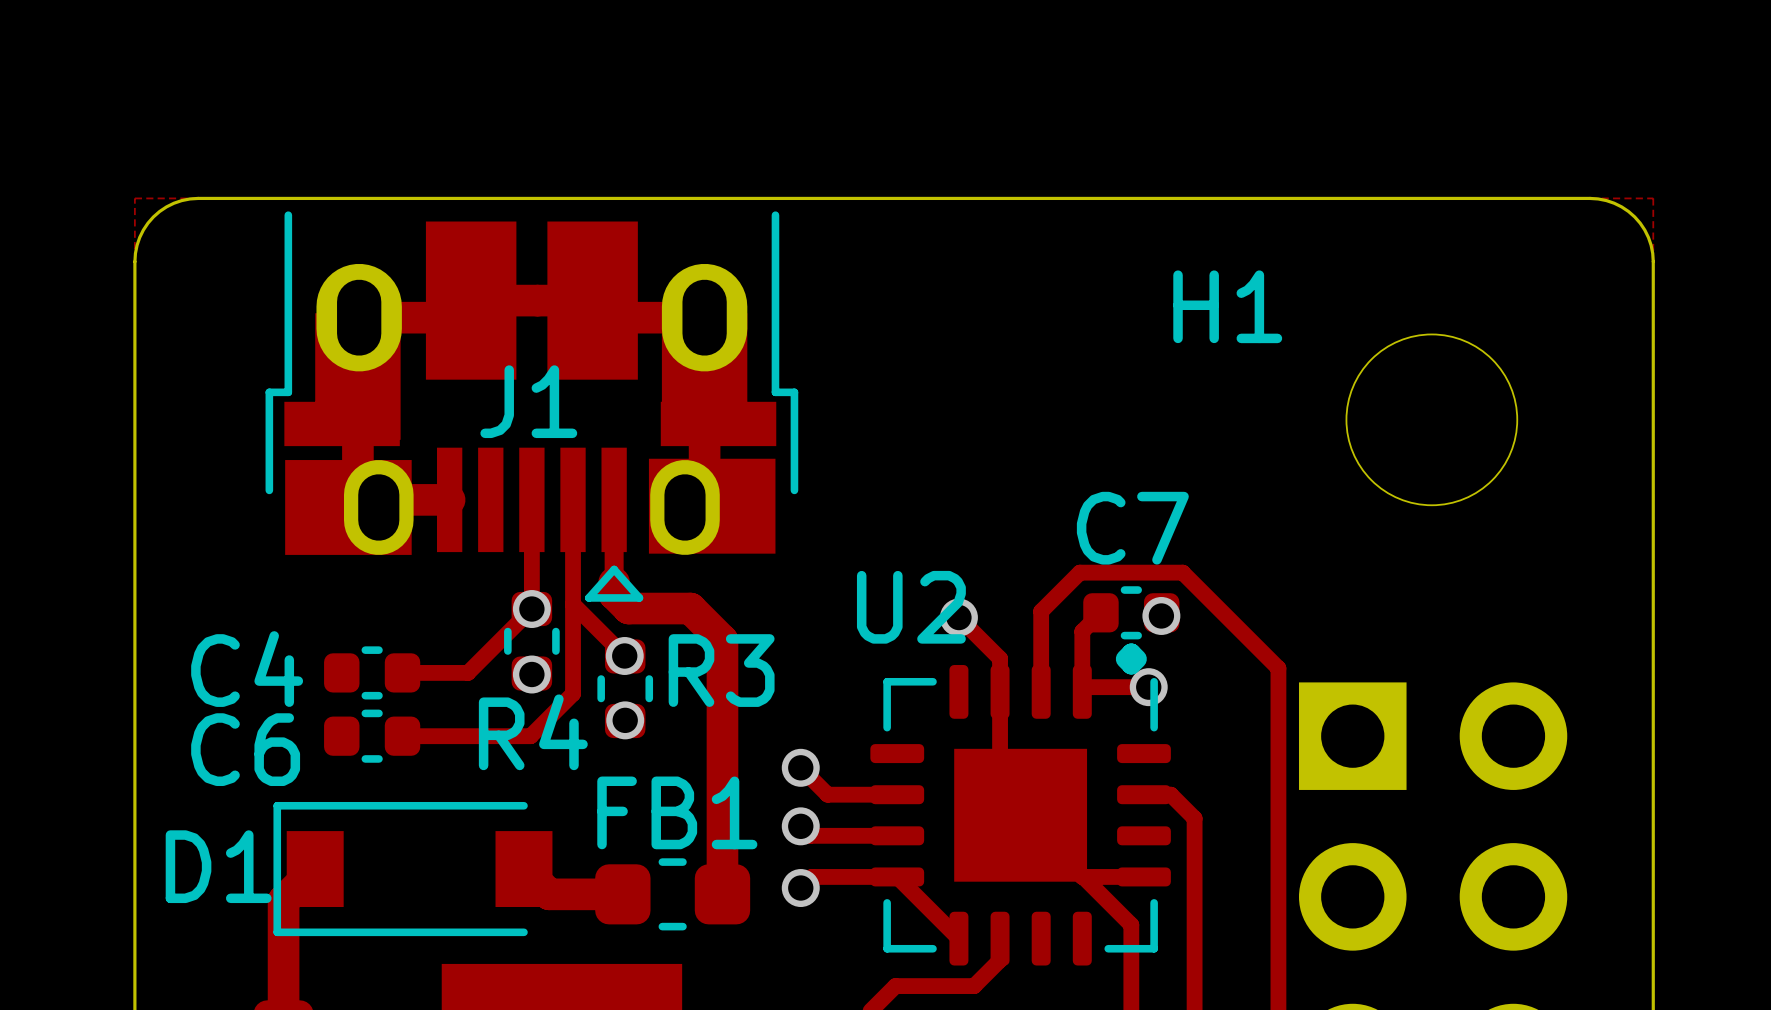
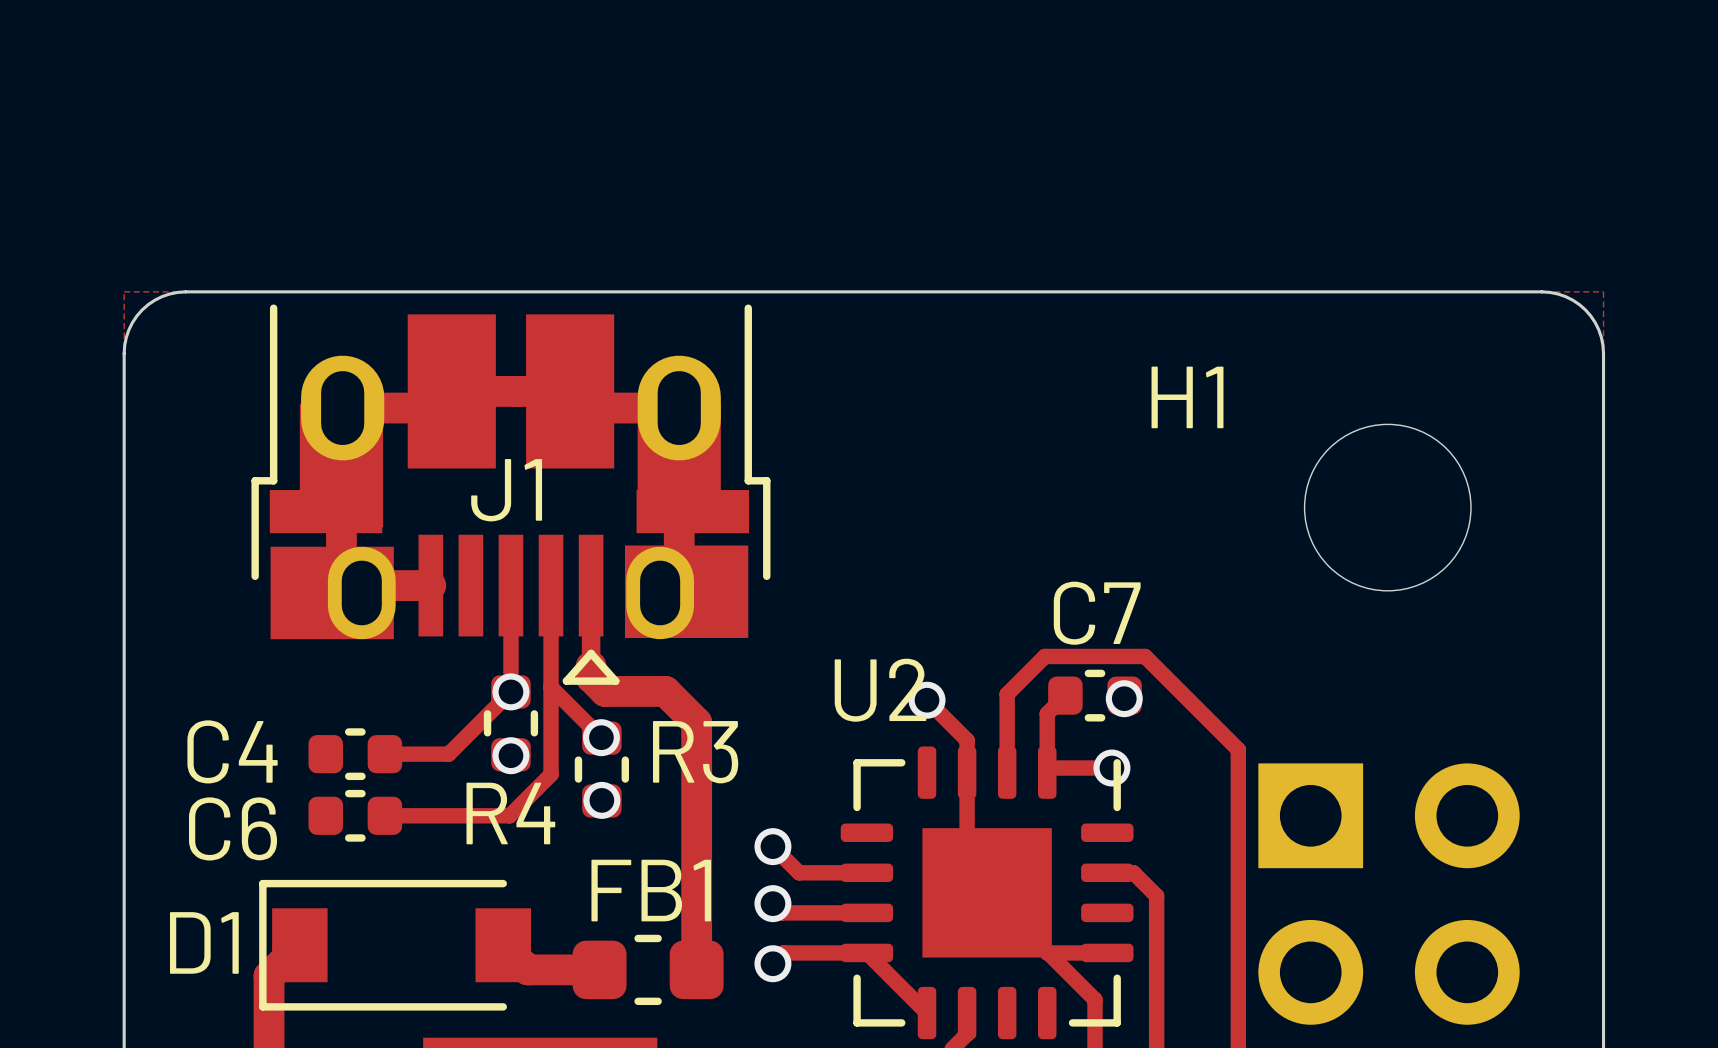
text: . (1131, 658) -> none

